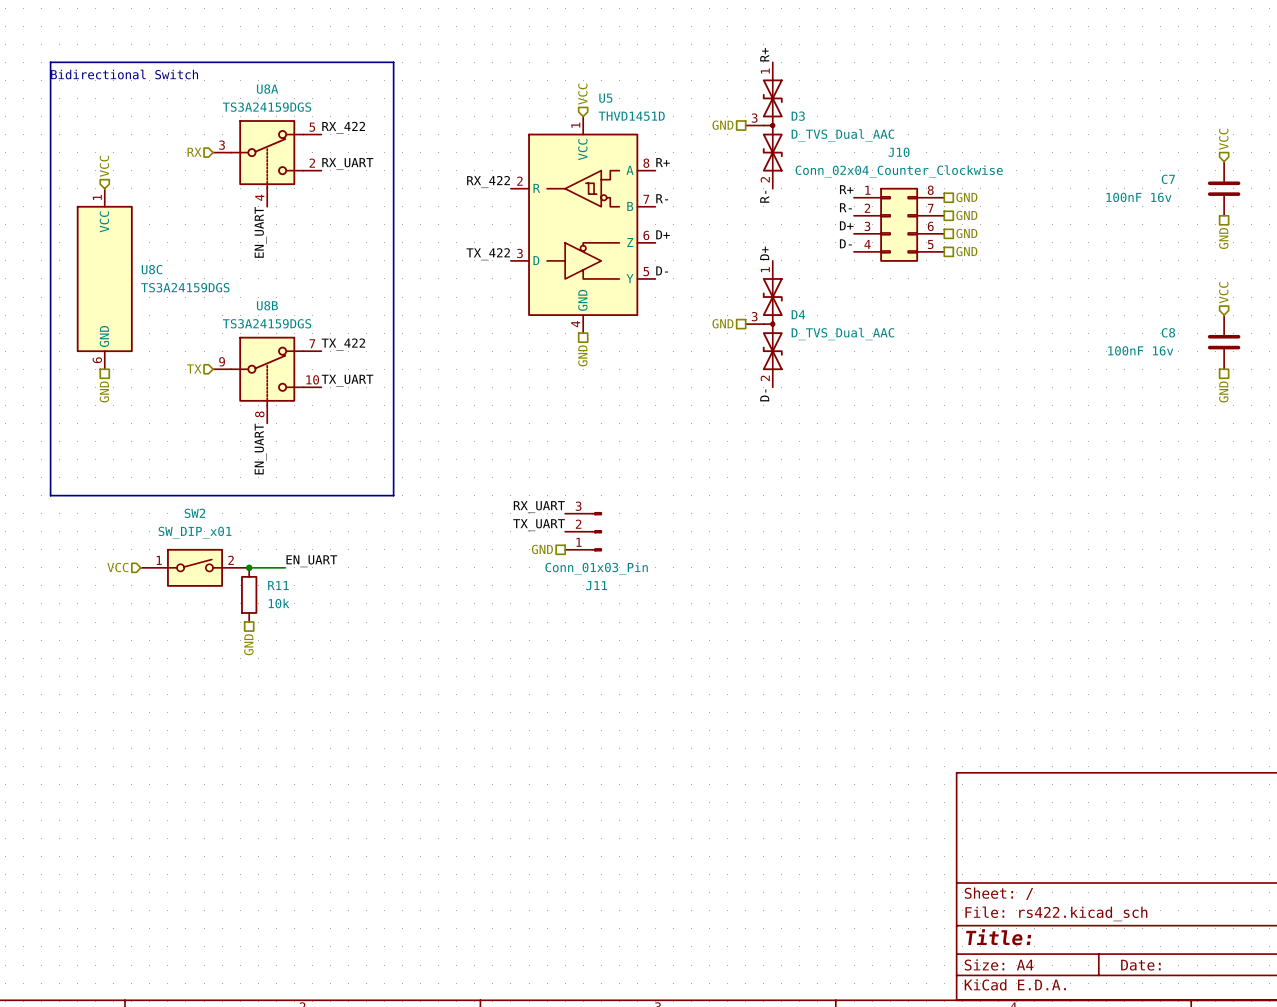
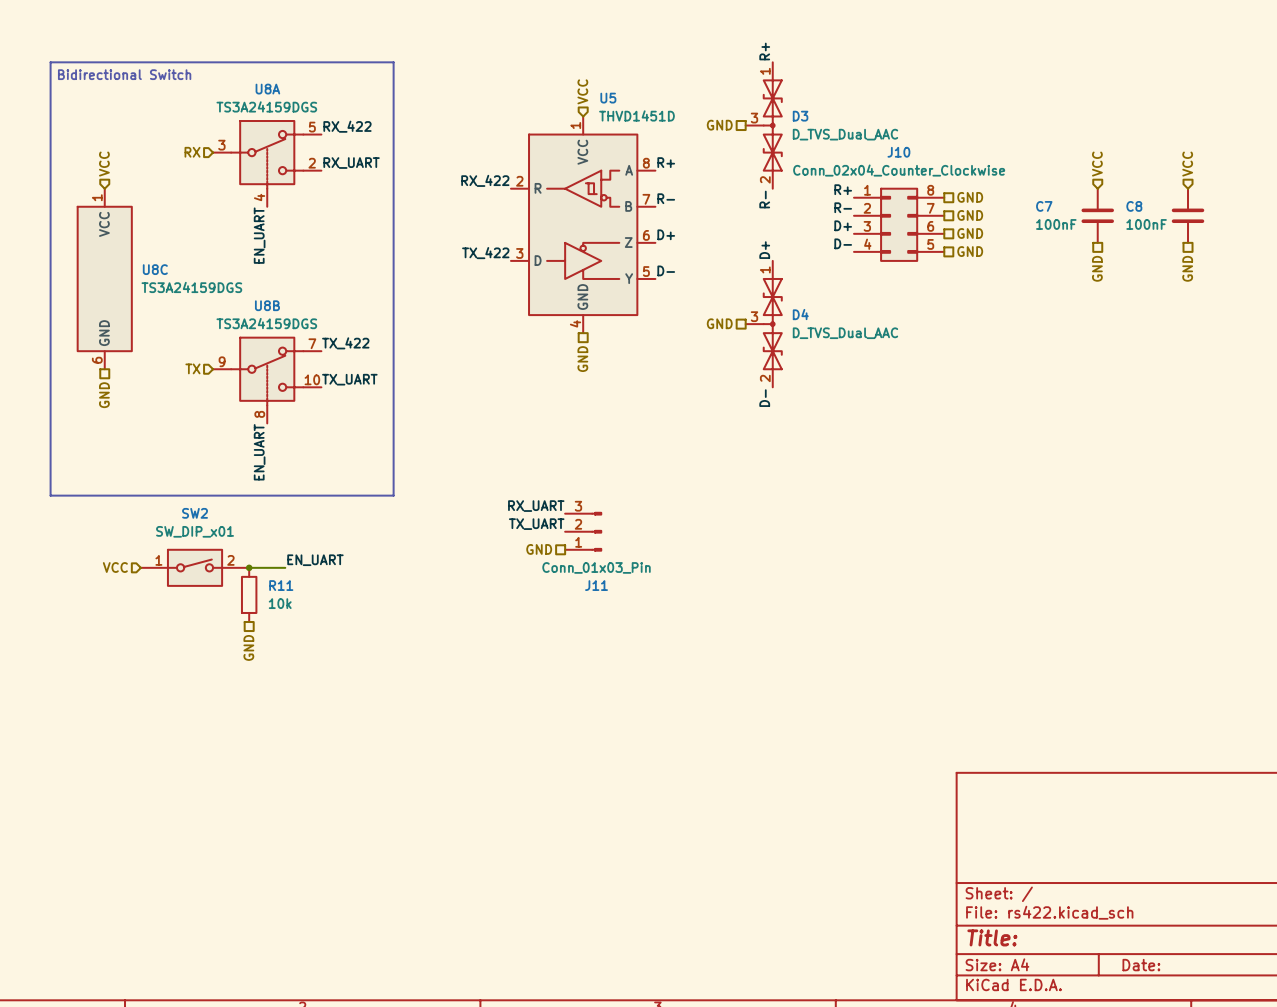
hierarchical label position: VCC (1223, 139) -> VCC (1187, 164)
hierarchical label: none -> VCC (1097, 164)
C7 position: (1224, 188) -> (1097, 215)
C7 value: 100nF 16v (1138, 197) -> 100nF (1056, 224)
hierarchical label position: GND (1223, 238) -> GND (1187, 268)
hierarchical label: none -> GND (1097, 268)
hierarchical label: VCC (1223, 292) -> none
C8 position: (1224, 342) -> (1188, 215)
C8 value: 100nF 16v (1140, 350) -> 100nF (1146, 224)
hierarchical label: GND (1223, 391) -> none

